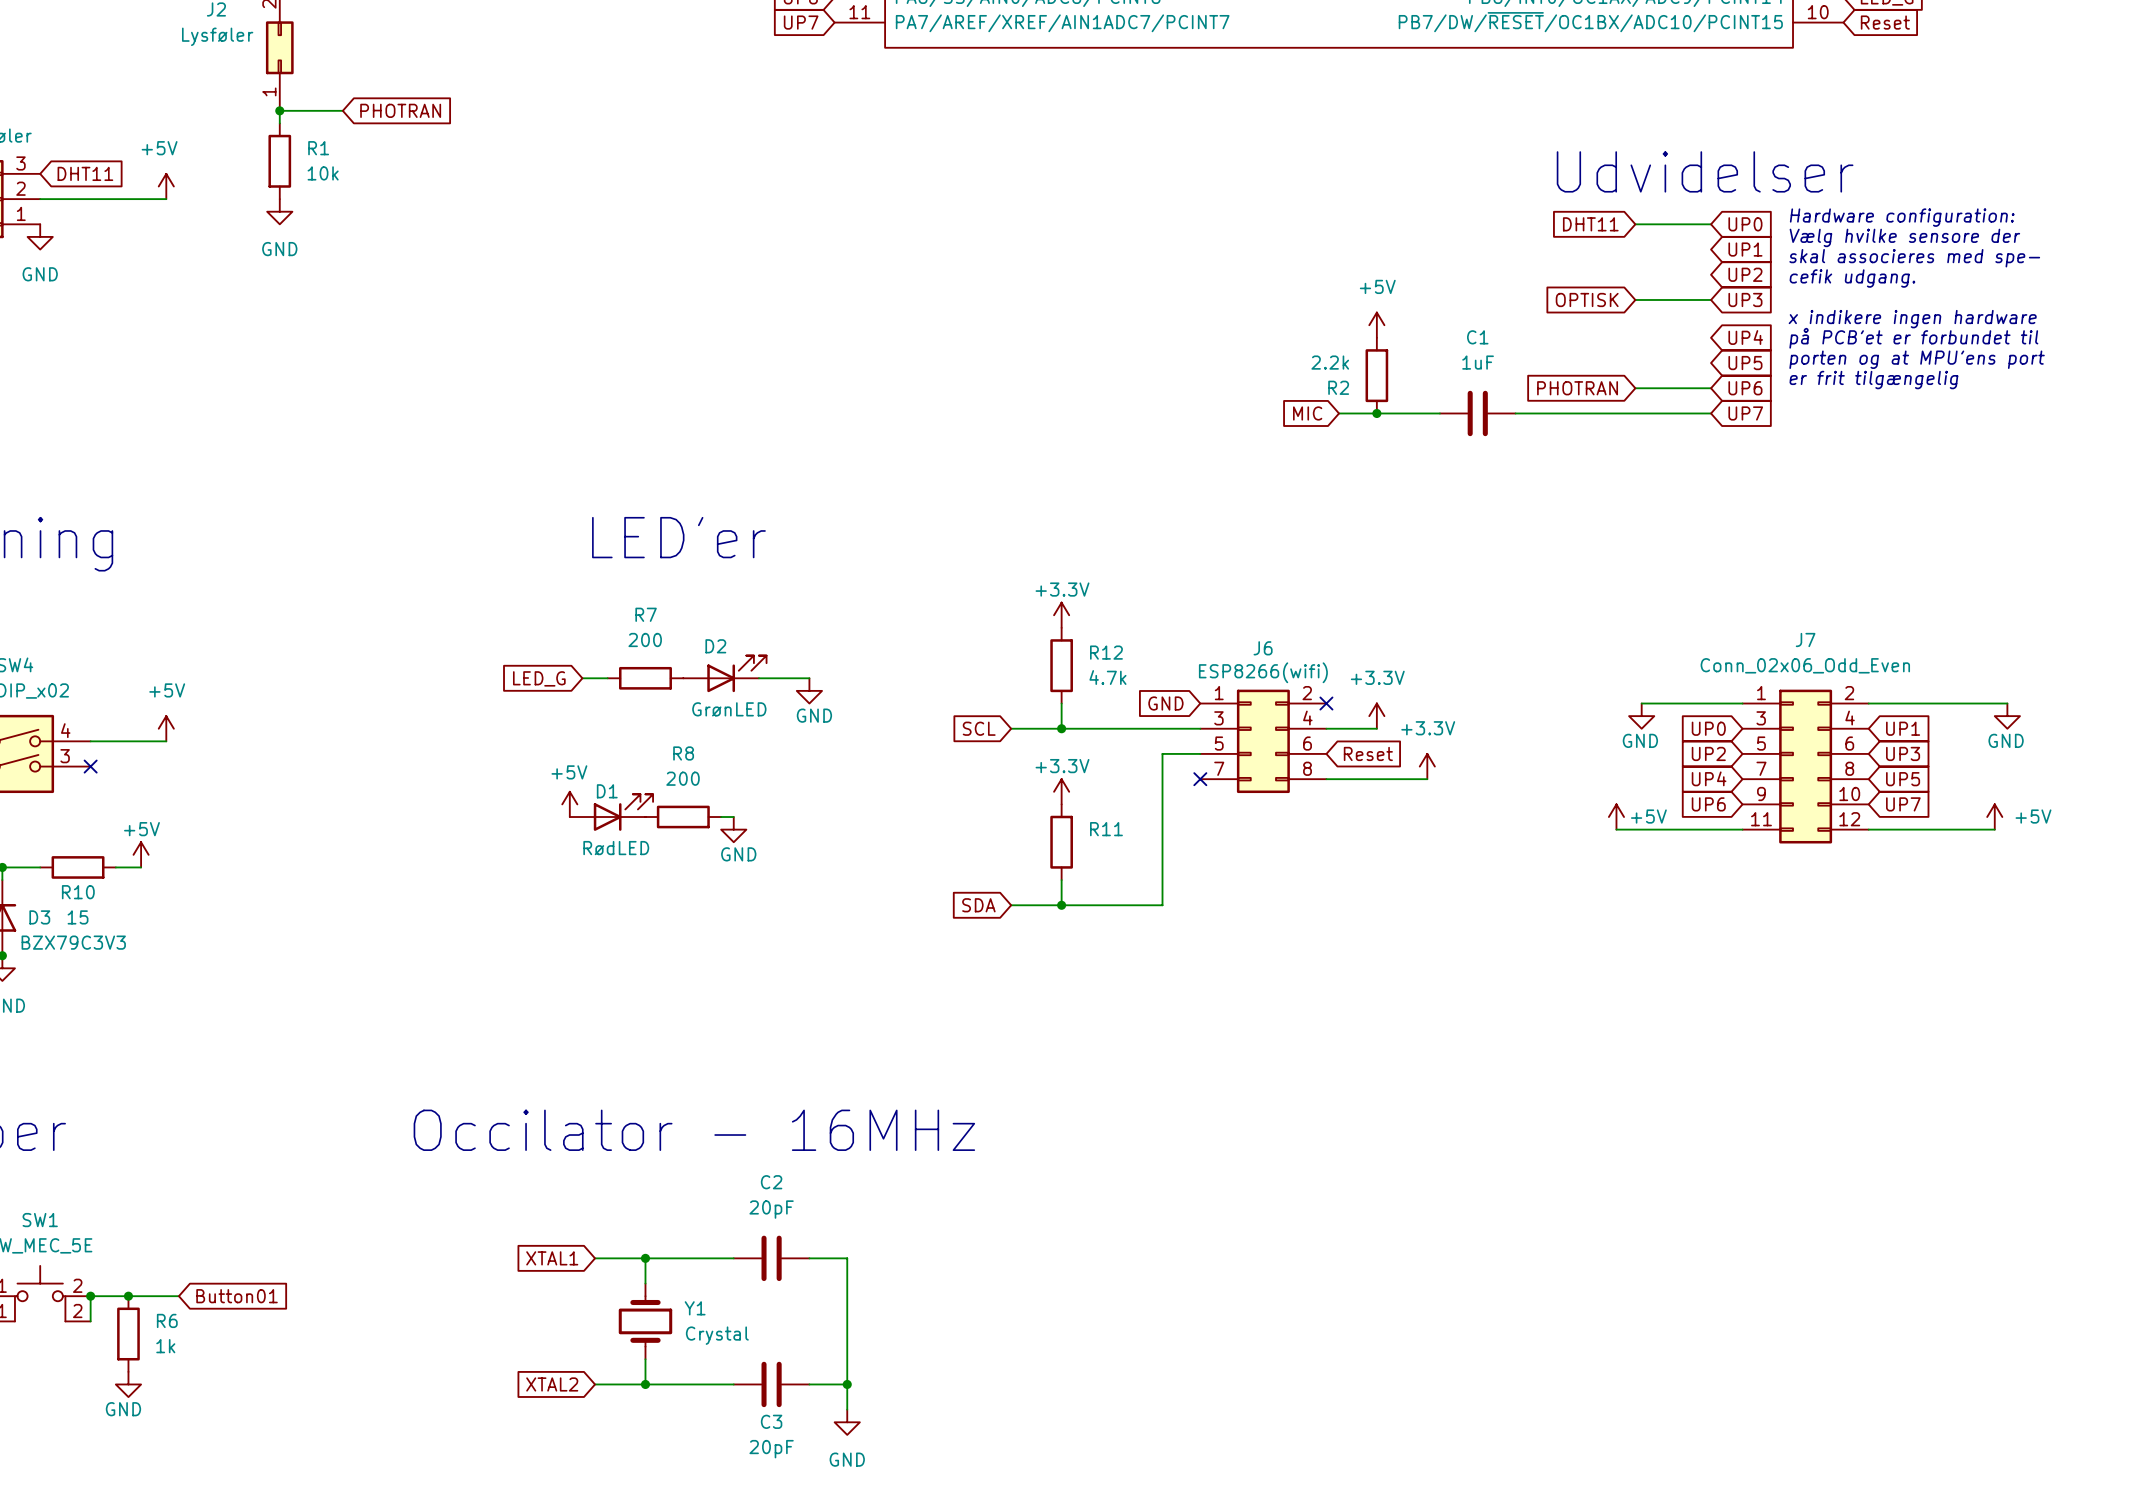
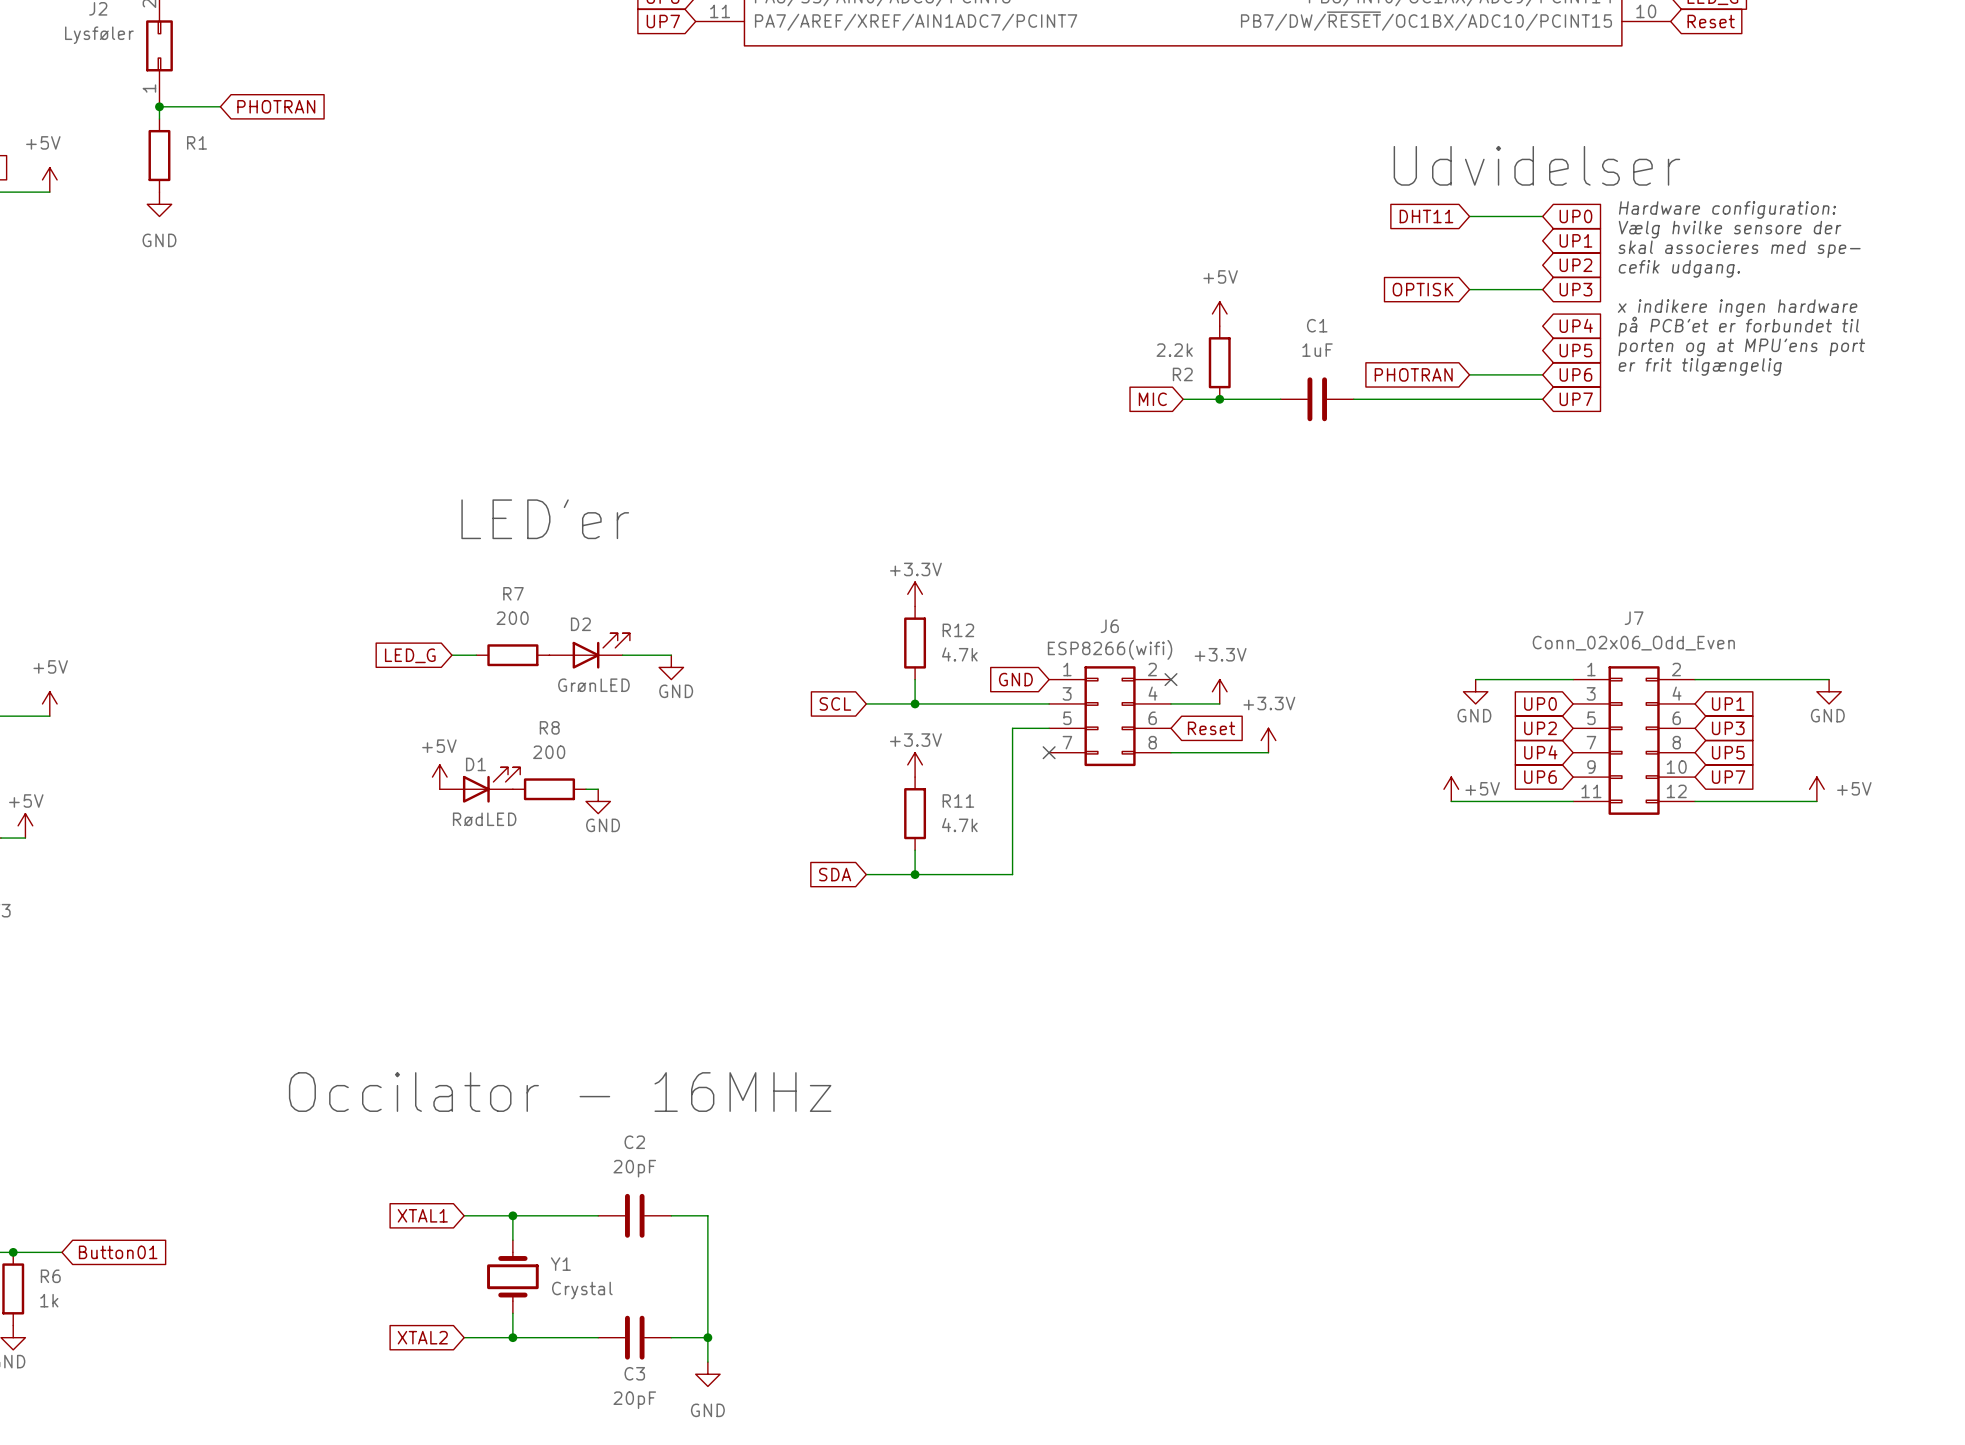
R1 value: 10k (323, 173) -> none
R11 value: none -> 4.7k (959, 825)

